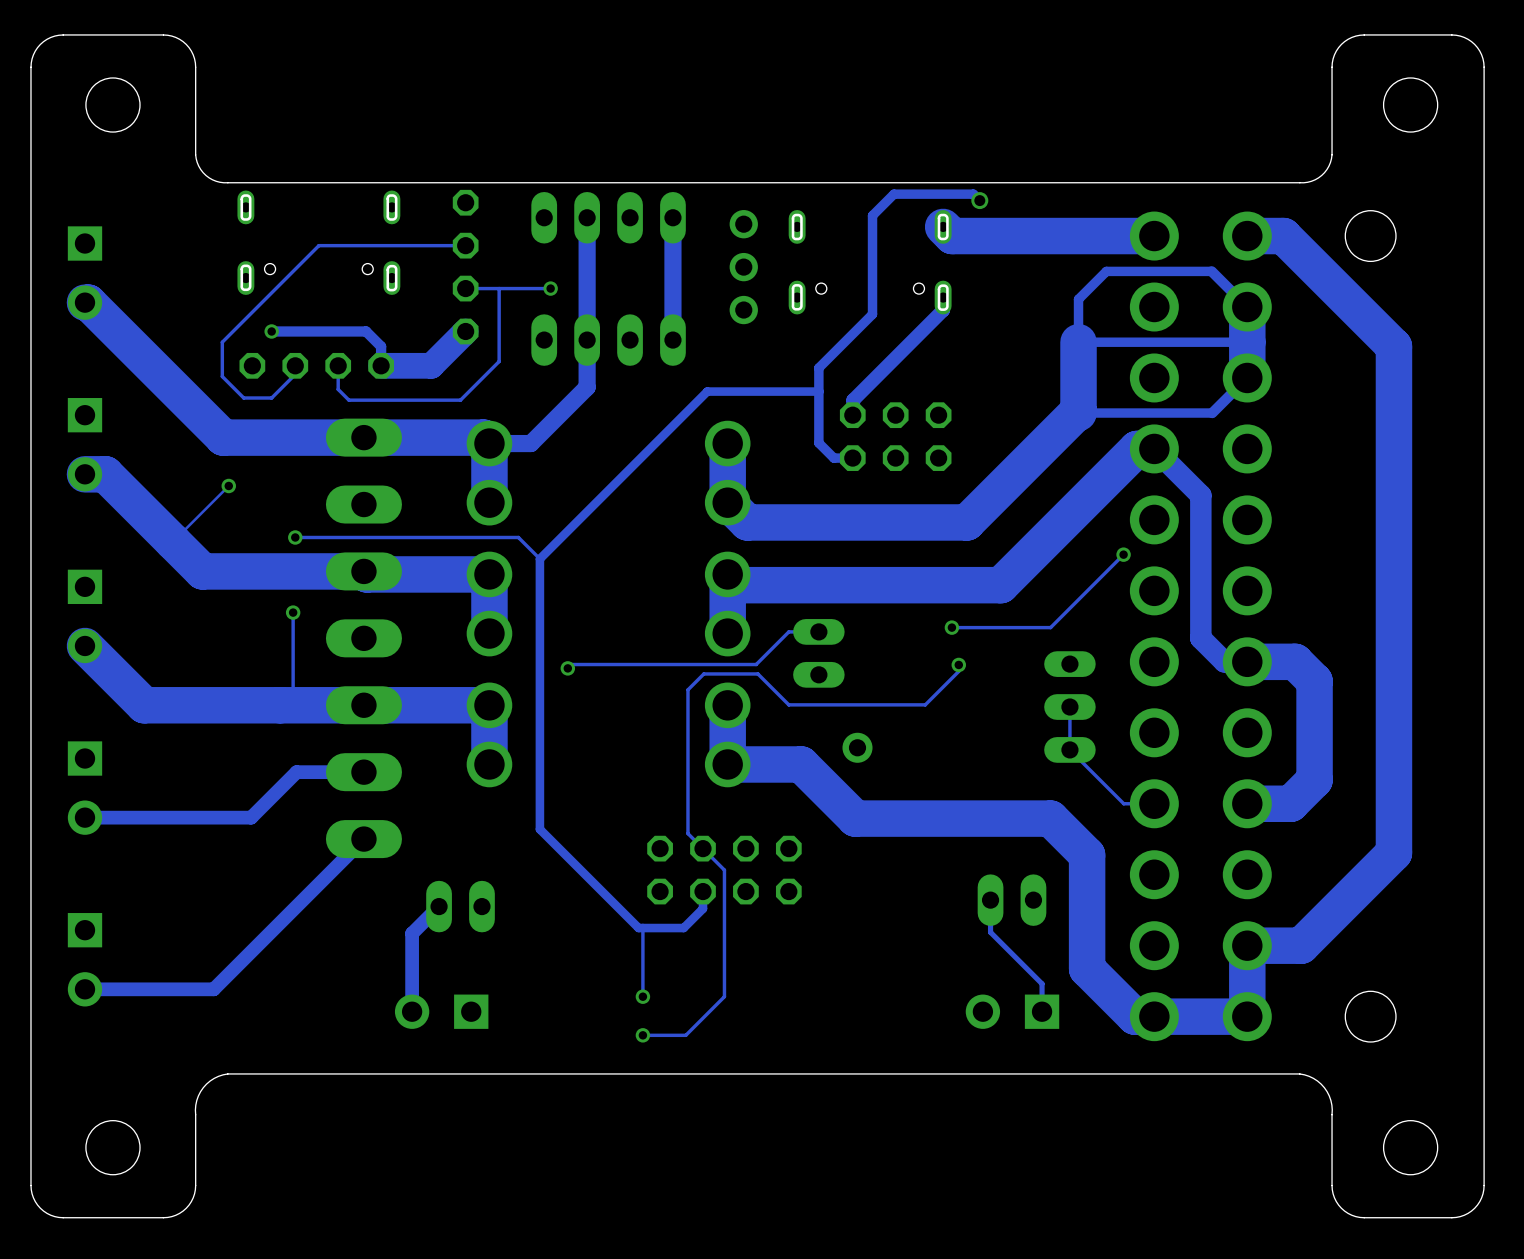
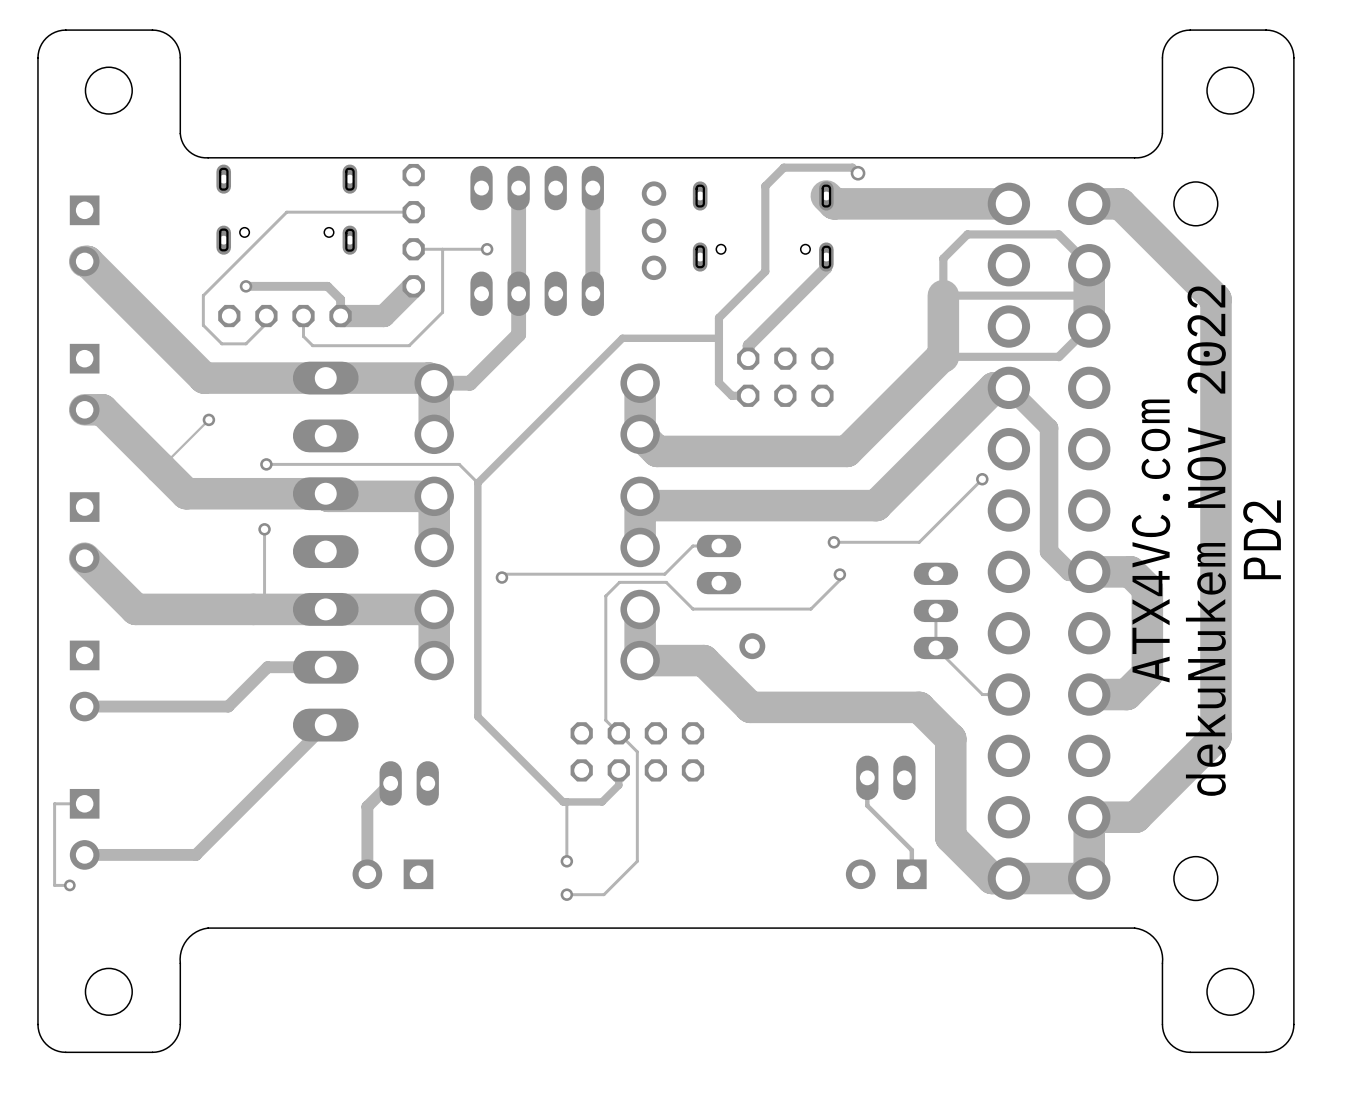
text: none -> PD2 (1262, 539)
text: none -> dekuNukem NOV 2022 (1205, 540)
text: none -> ATX4VC.com (1151, 541)
track: none -> (84, 803) (54, 803) (54, 885) (69, 885)
via: none -> (69, 885)

